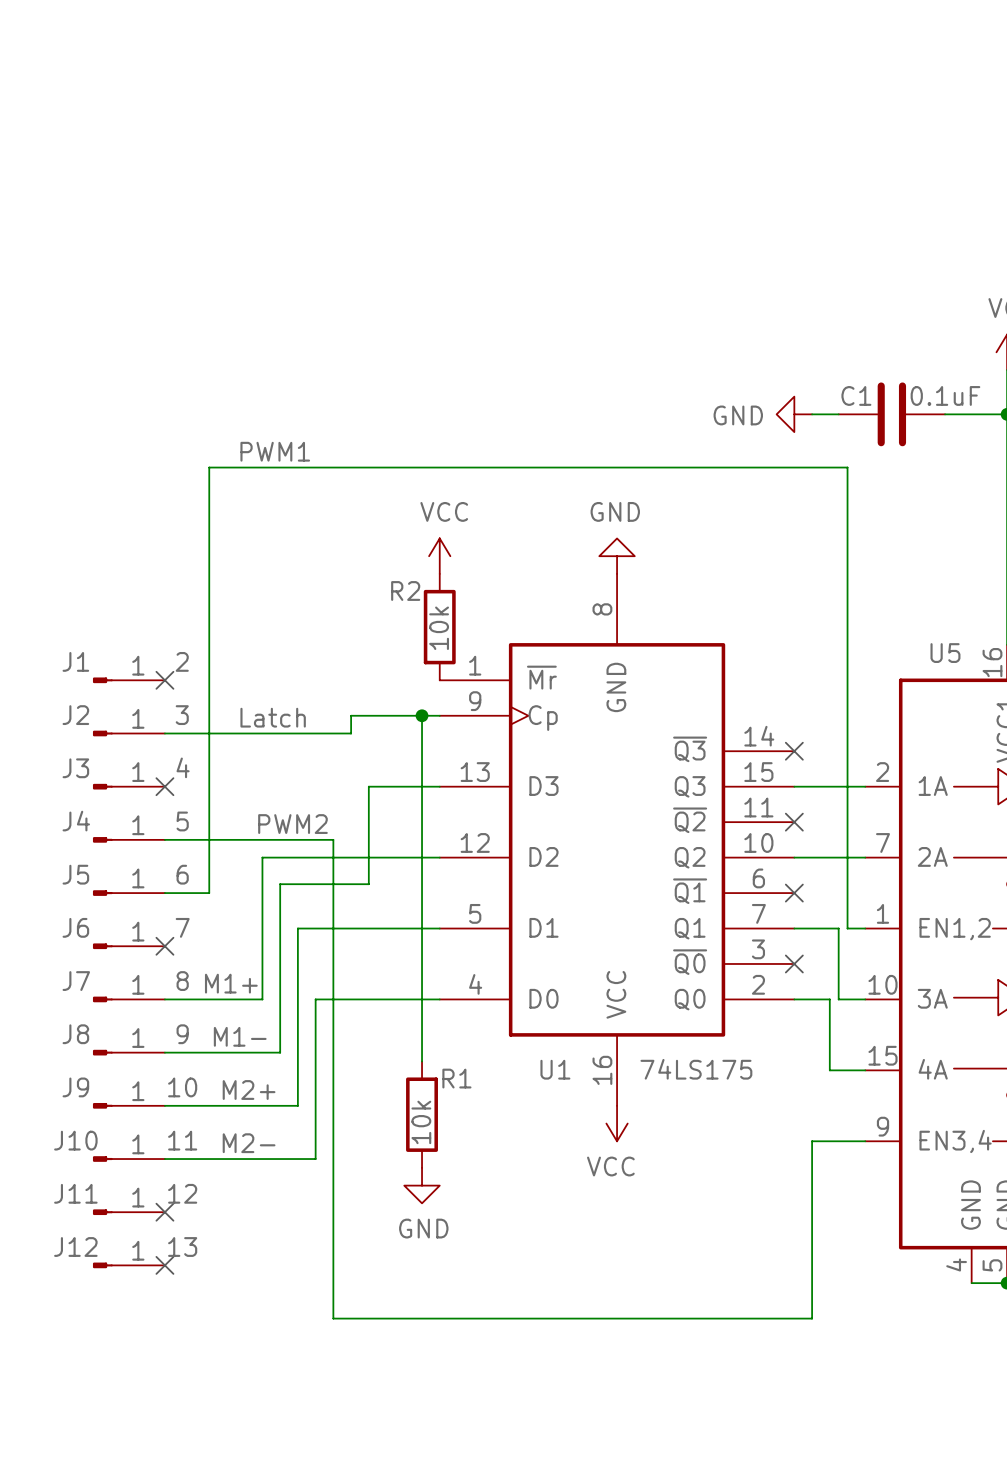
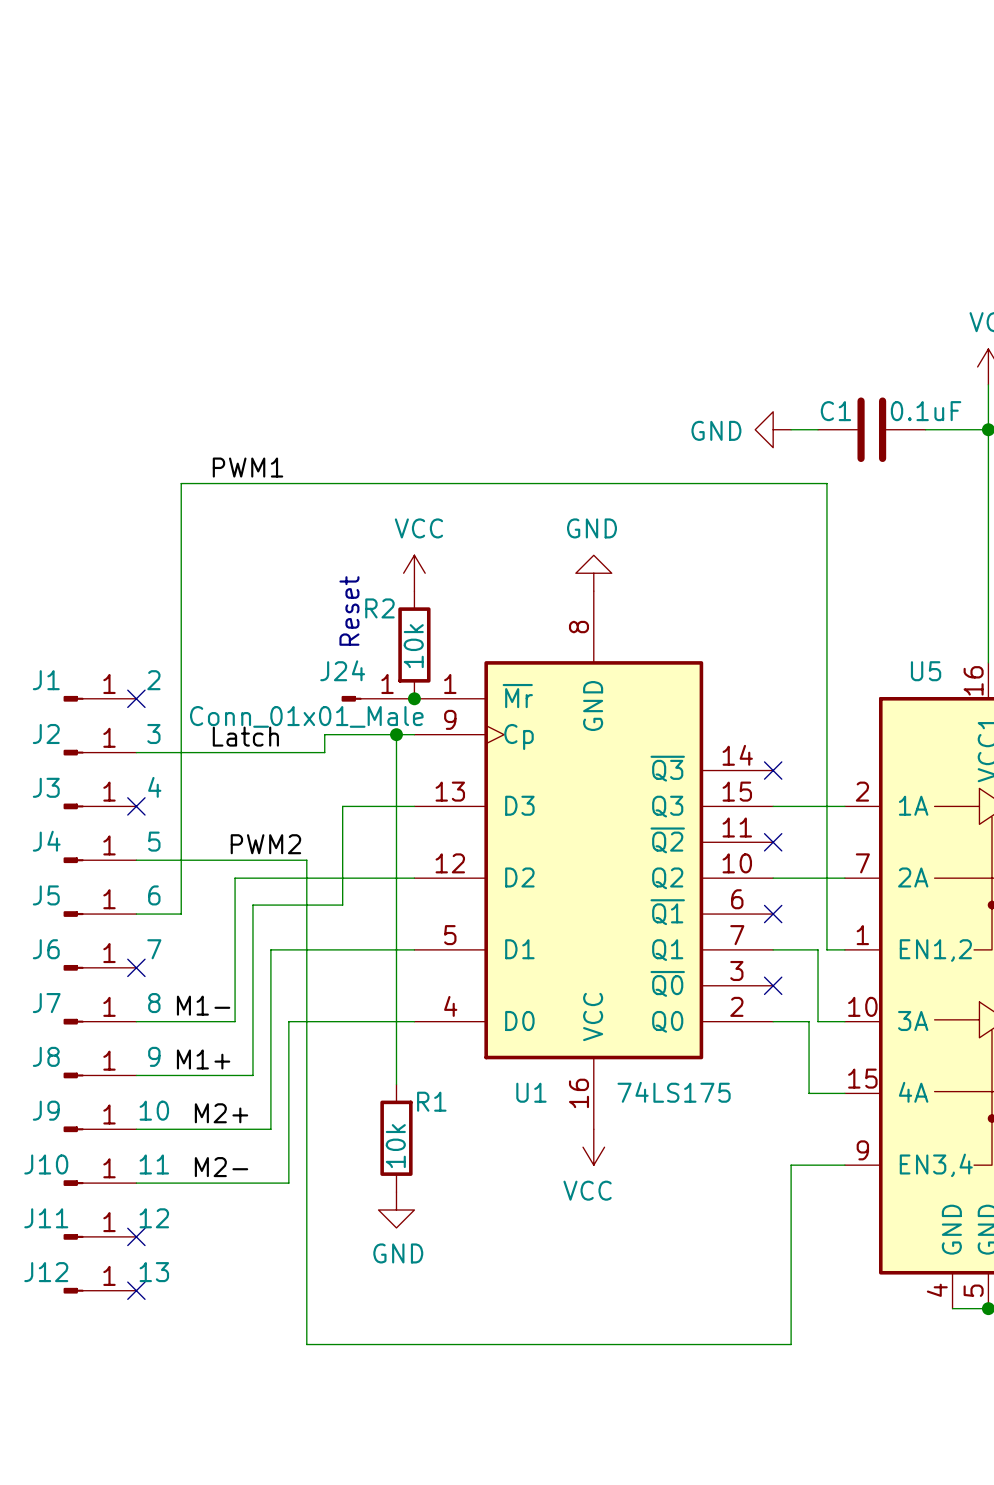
text: none -> Reset (349, 610)
J24: none -> Conn_01x01_Male (378, 698)
junction: none -> (414, 698)
label: M1+ (231, 983) -> M1- (203, 1005)
label: M1- (240, 1036) -> M1+ (203, 1059)

